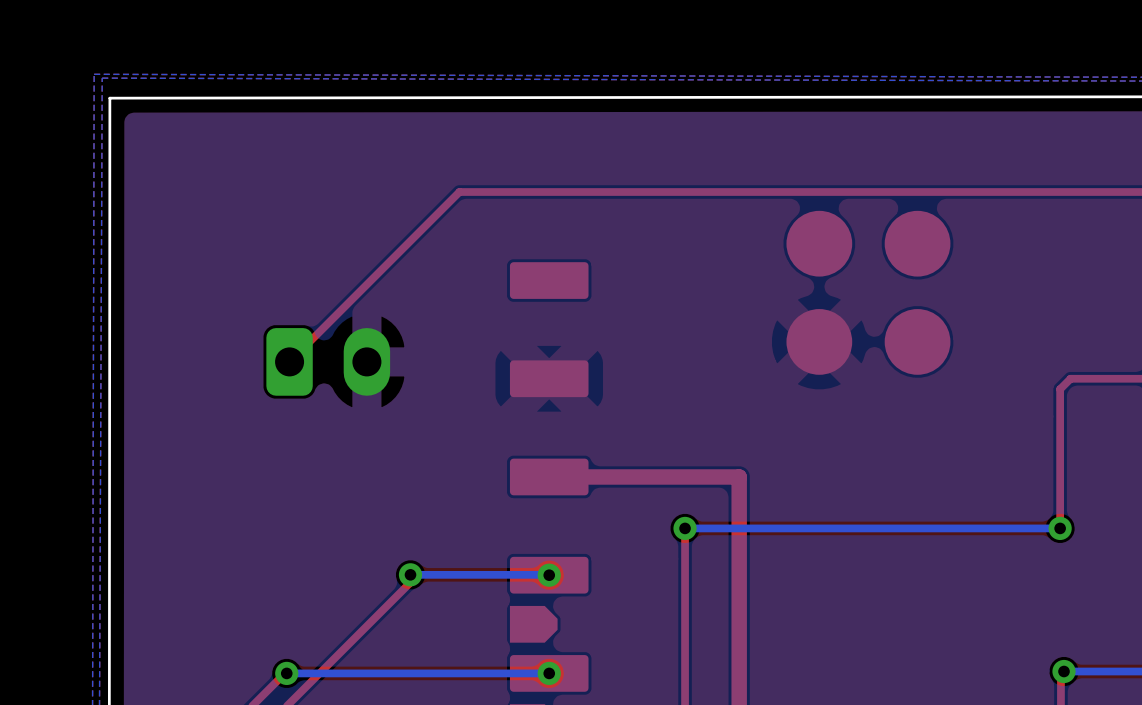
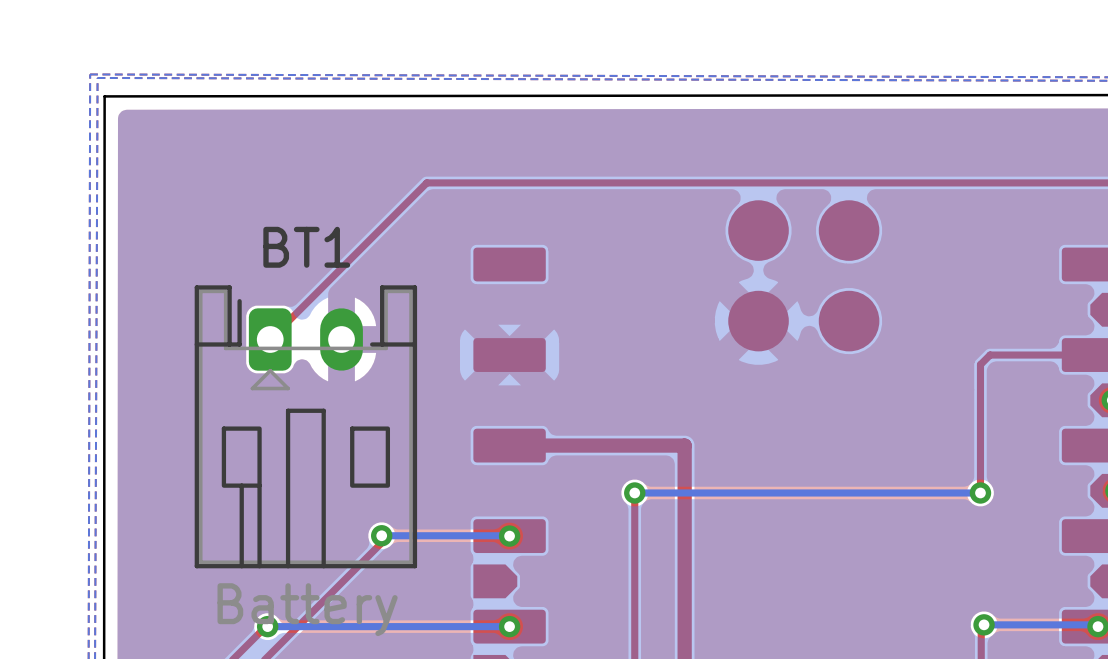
BT1 side: top (328, 361) -> bottom (305, 426)

